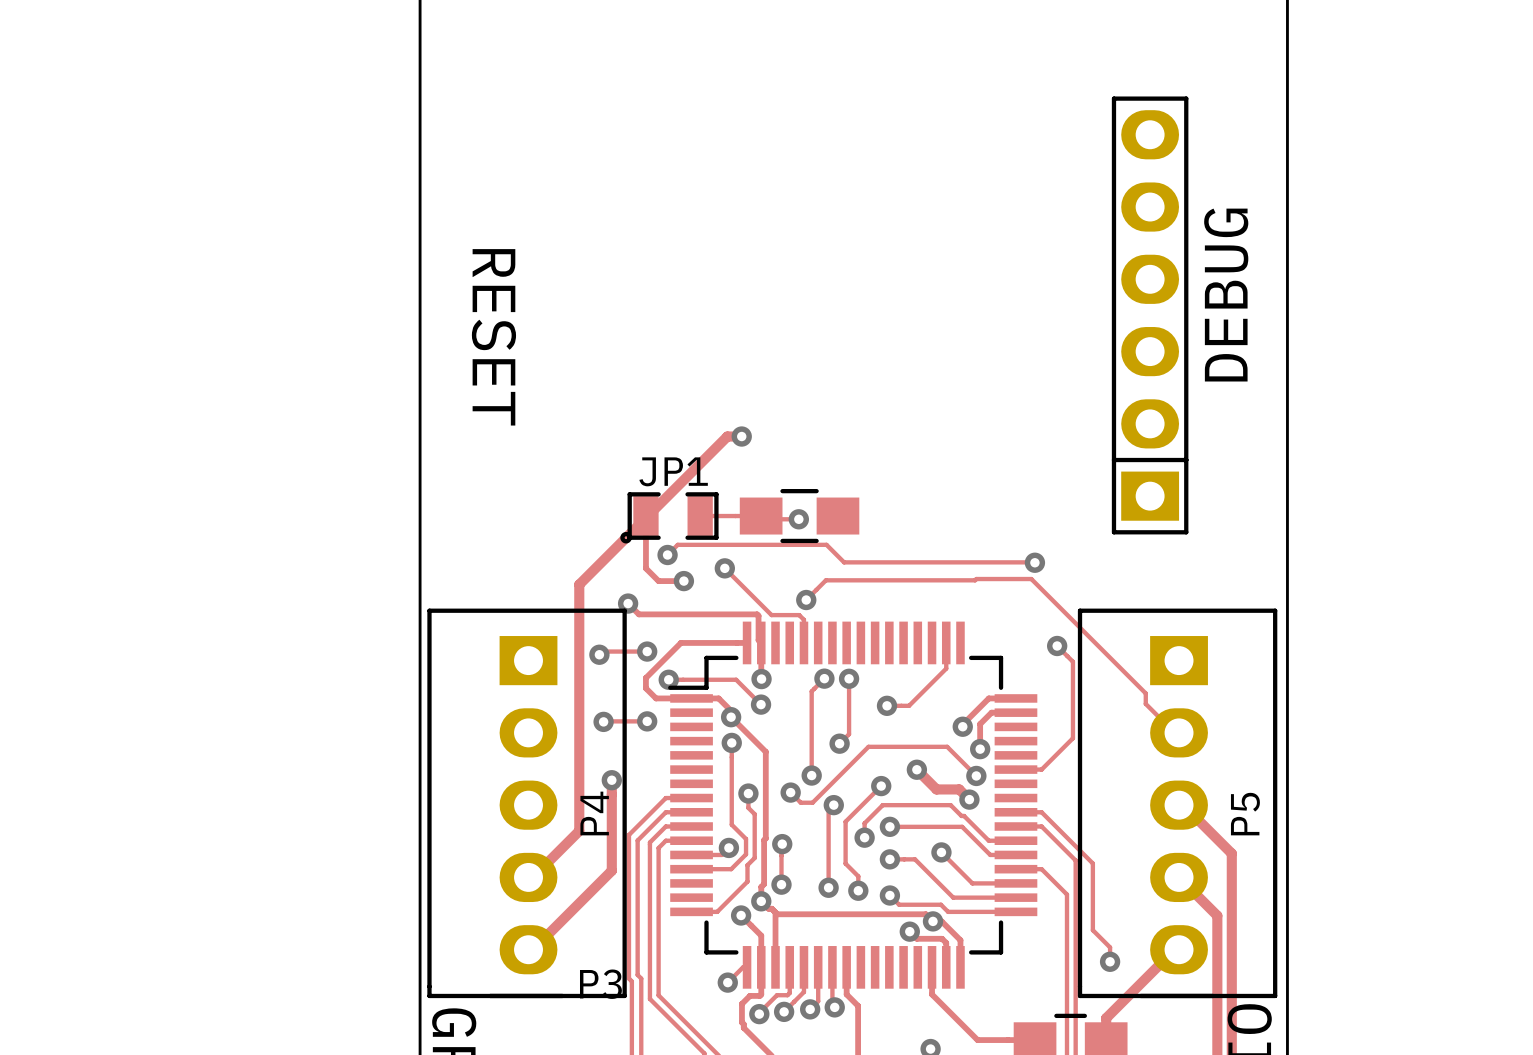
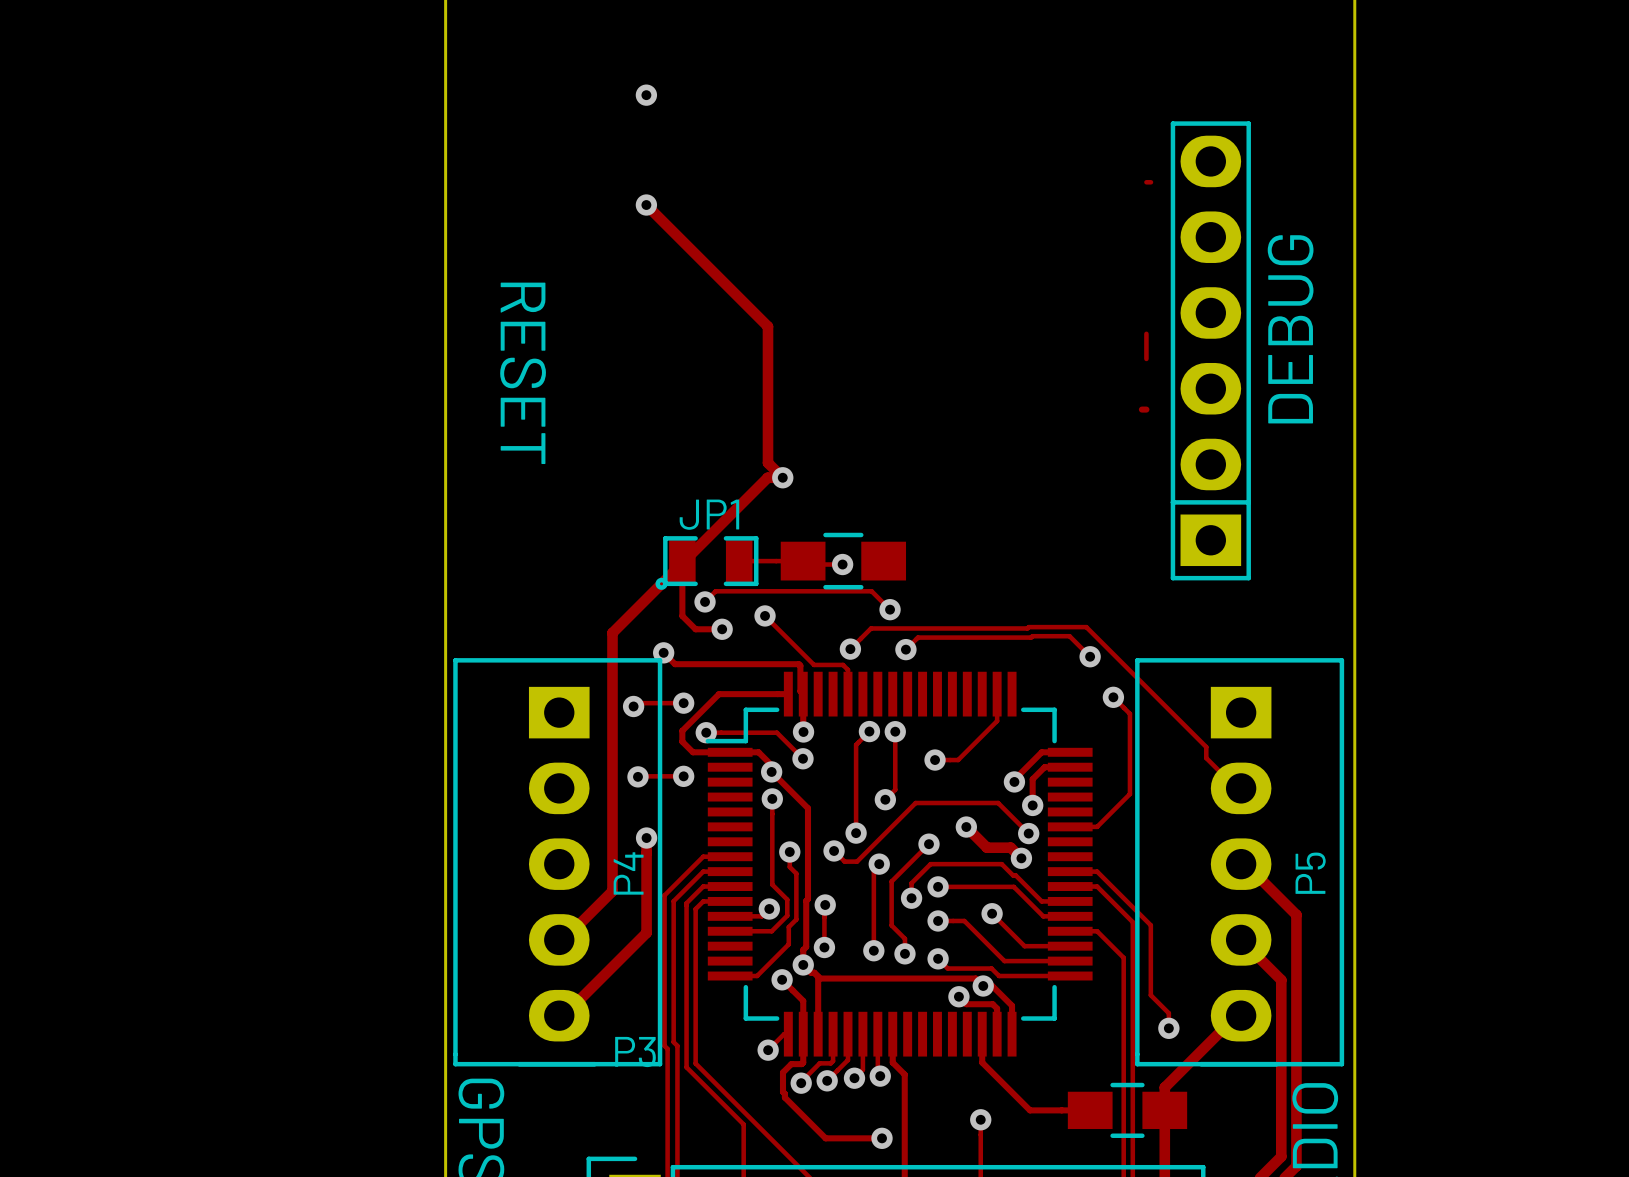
via: none -> (646, 95)
track: none -> (1146, 182) (1150, 182)
track: none -> (646, 205) (767, 326) (767, 462) (782, 477)
via: none -> (646, 205)
track: none -> (1146, 333) (1146, 358)
track: none -> (1141, 409) (1146, 409)
track: (844, 562) (1034, 562) -> none
via: none -> (890, 609)
via position: (1034, 562) -> (1090, 656)
track: none -> (905, 649) (917, 637) (1069, 636) (1090, 656)
via: none -> (905, 649)

